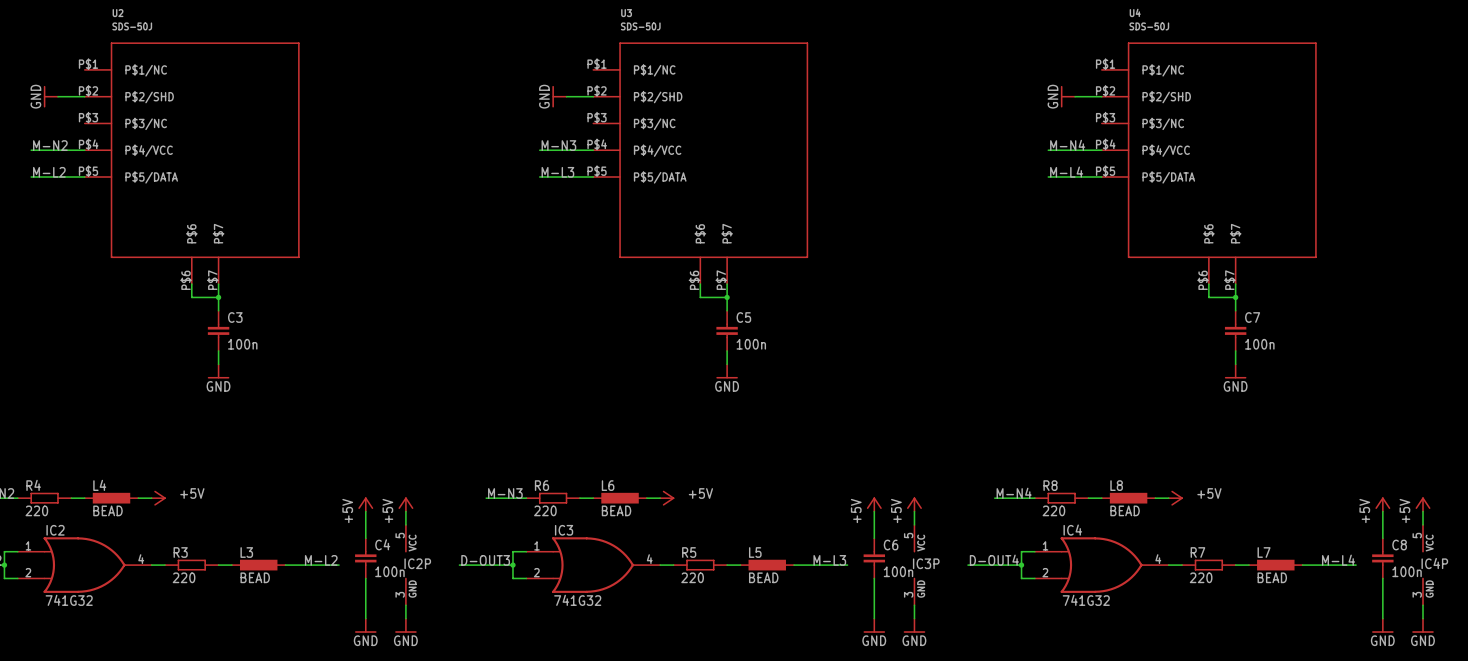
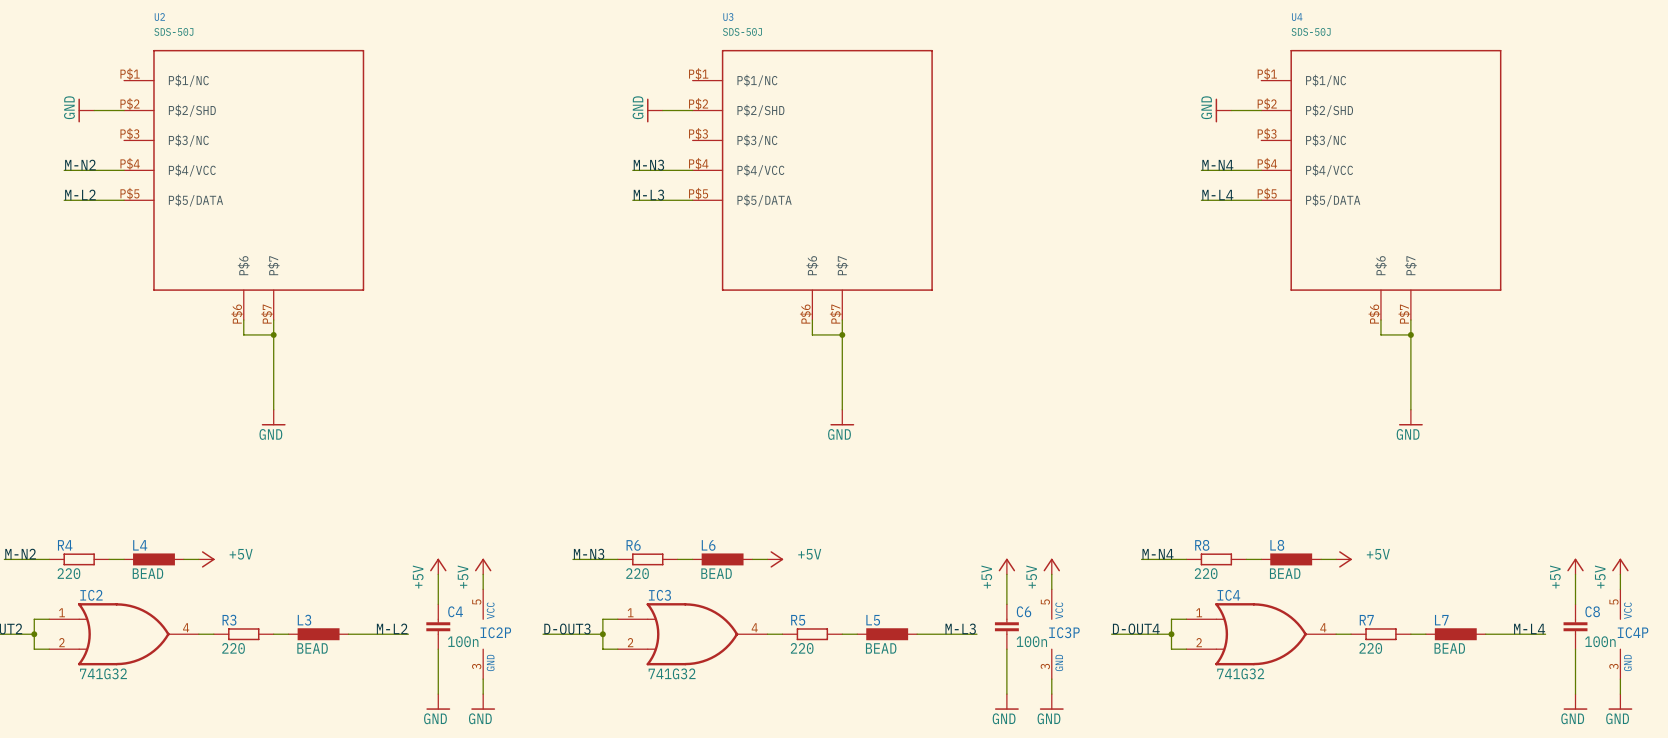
C3: 100n (218, 330) -> none
C5: 100n (727, 330) -> none
C7: 100n (1235, 330) -> none

